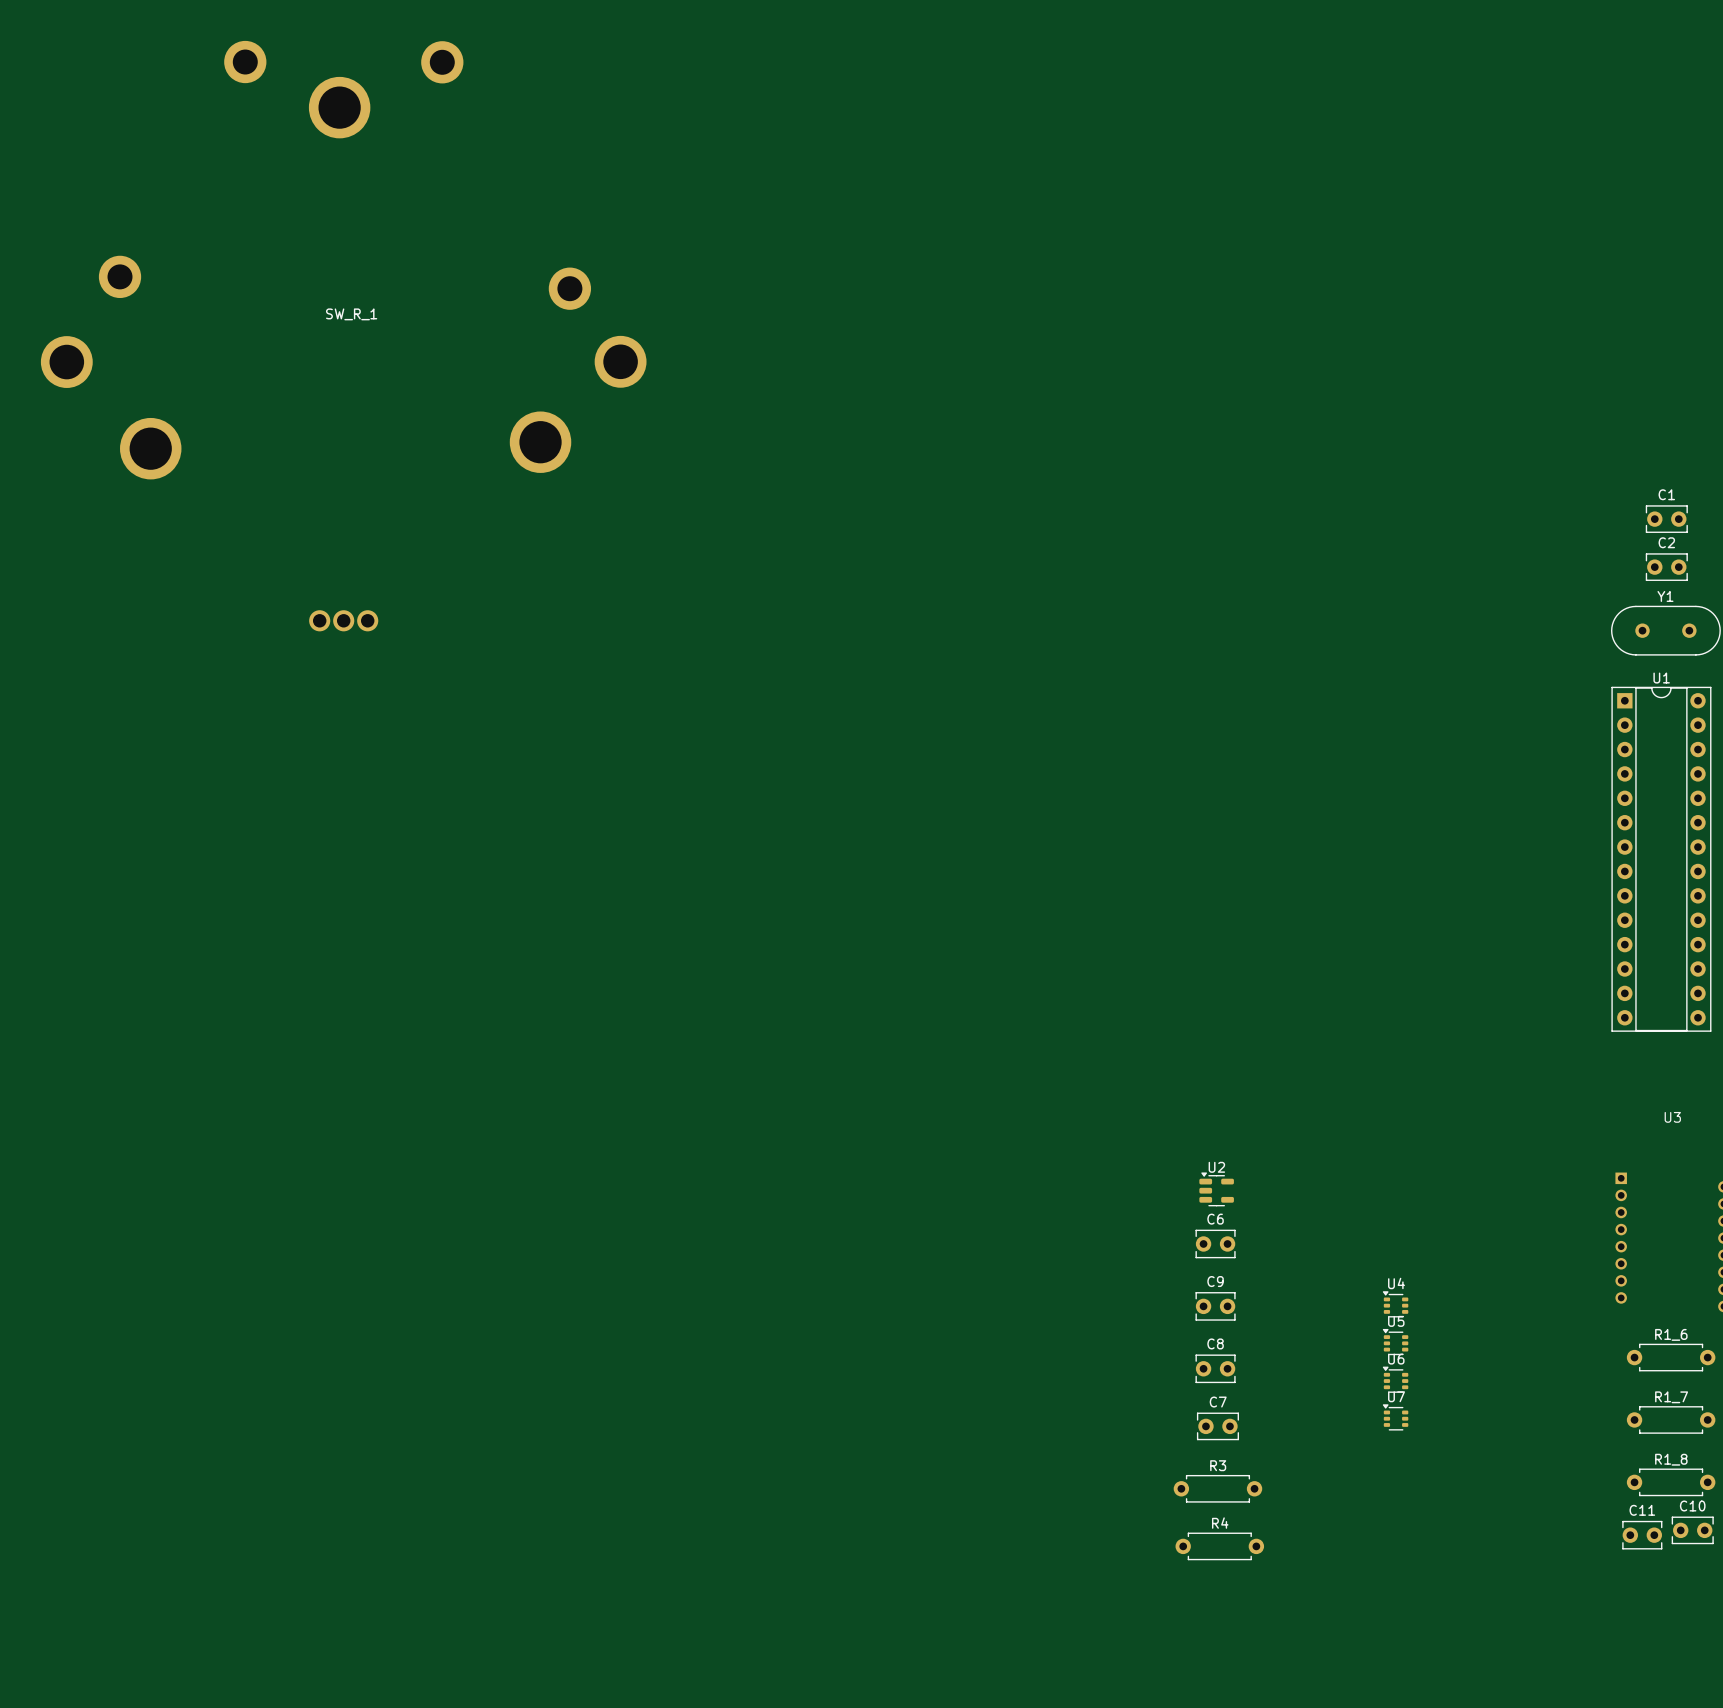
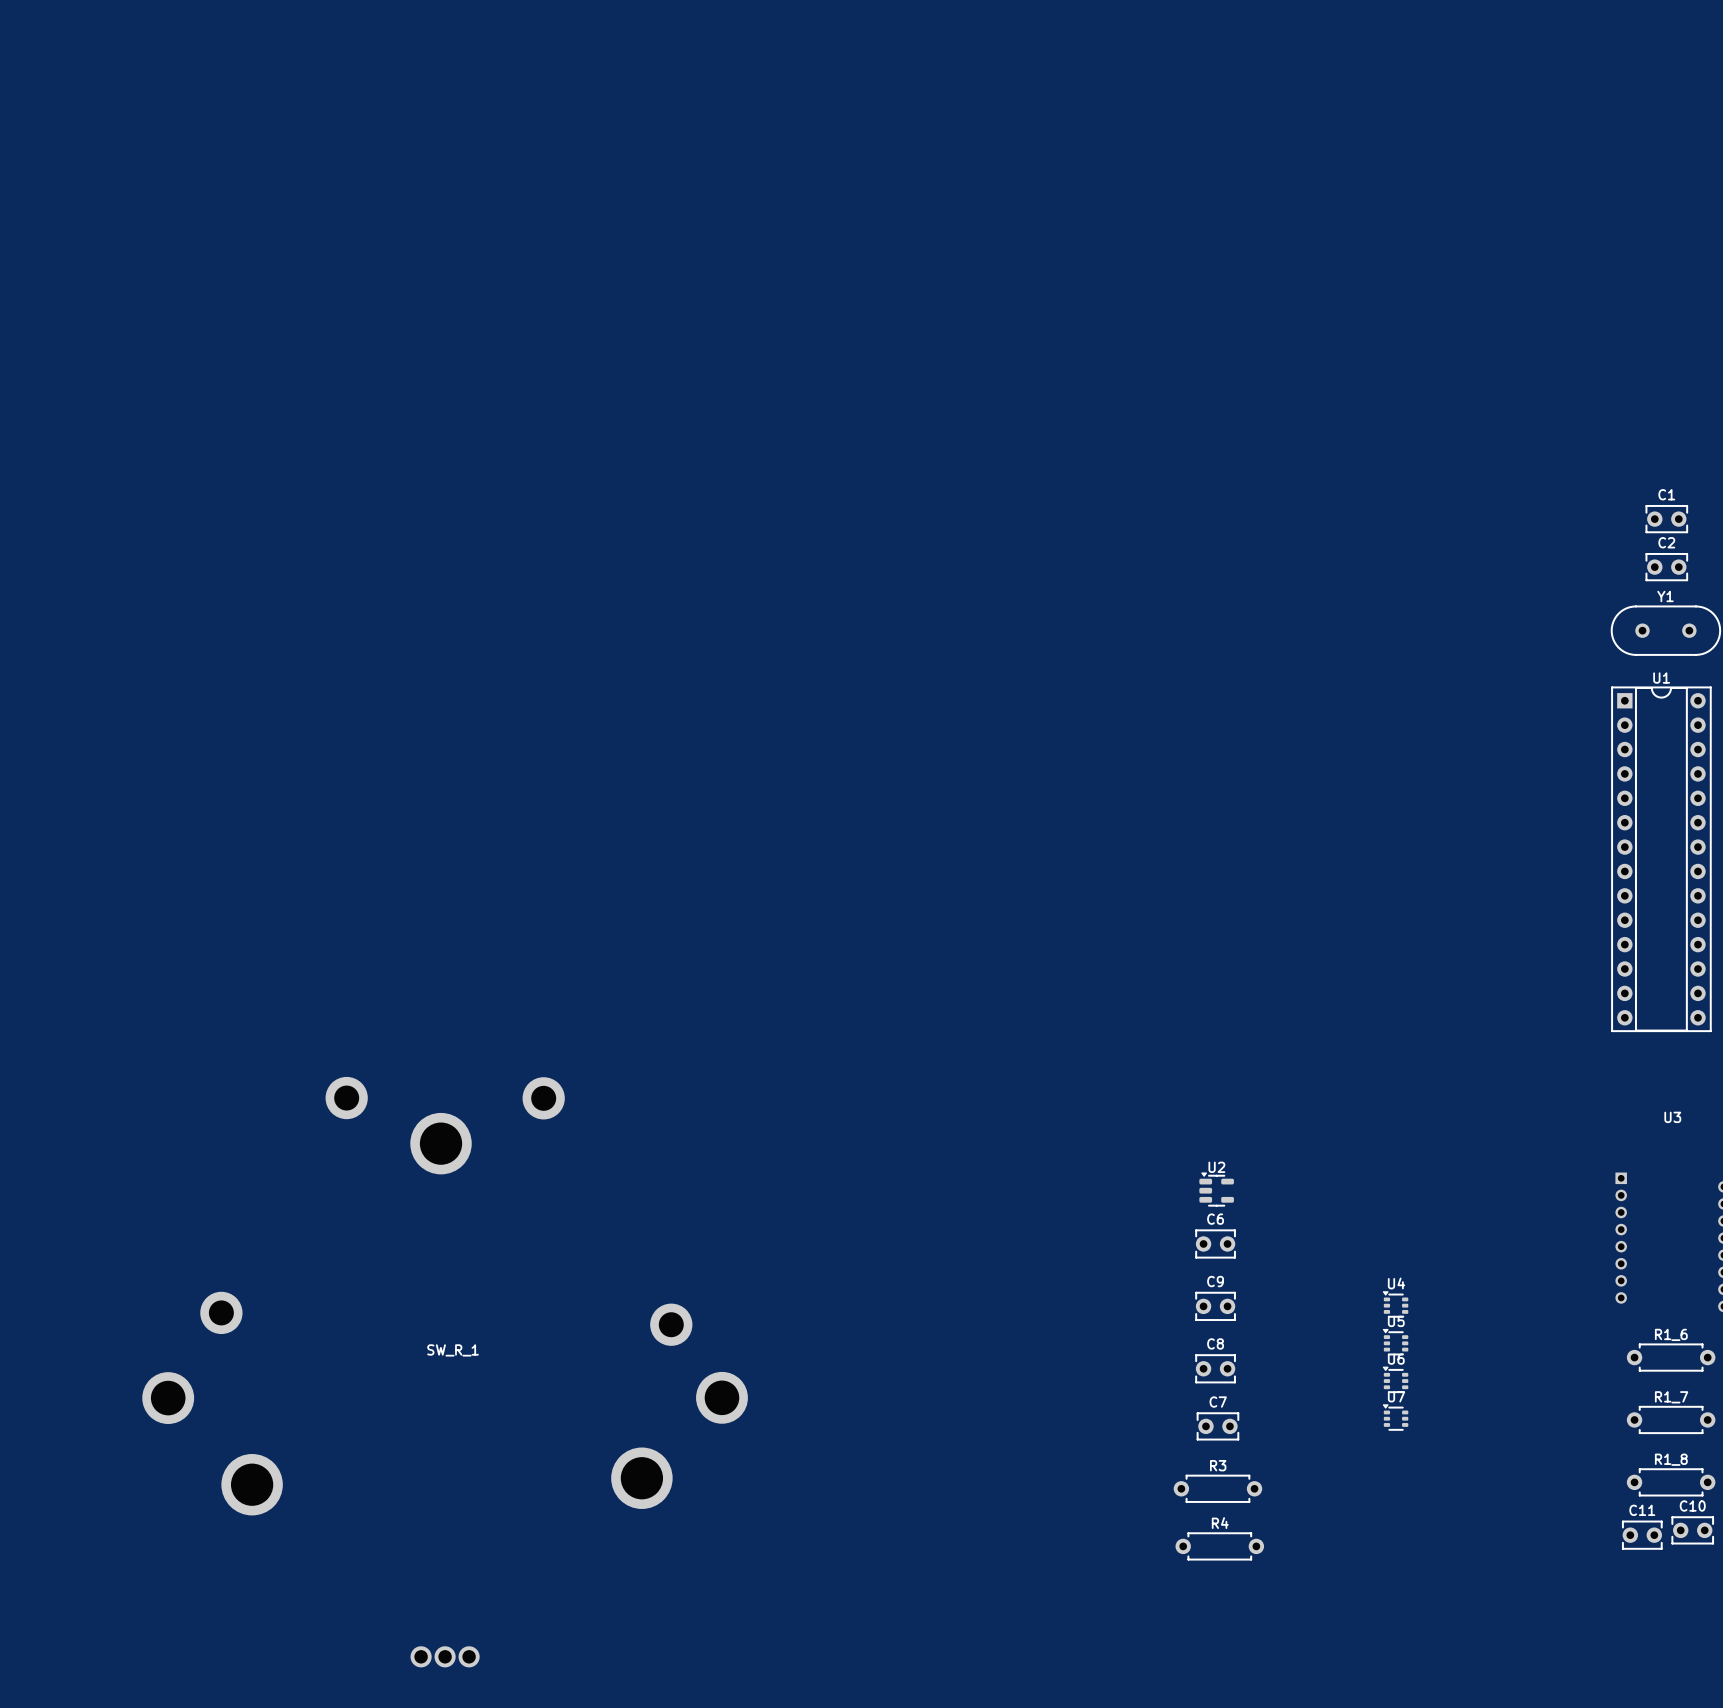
SW_R_1 position: (343, 336) -> (445, 1372)

